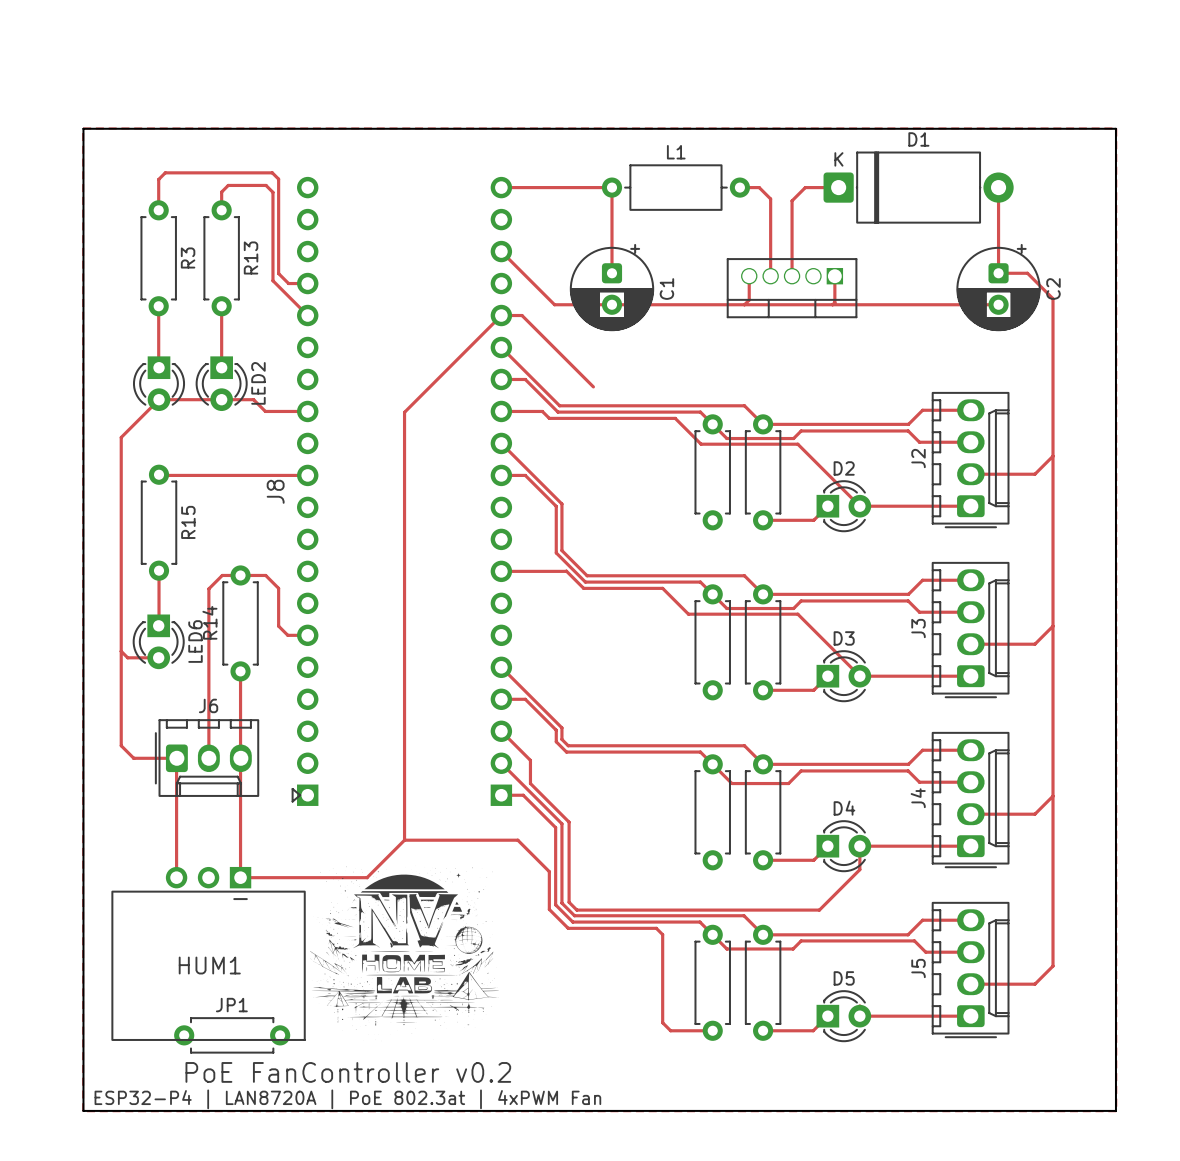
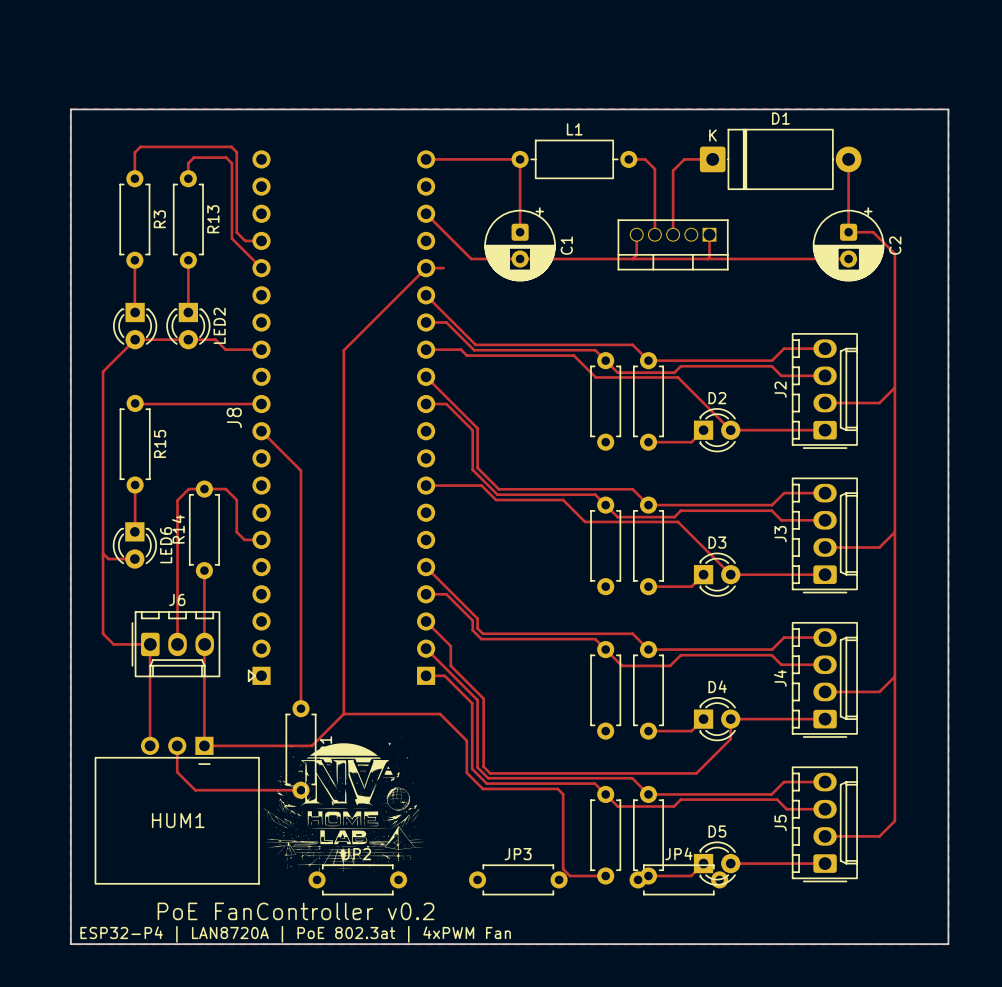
top track: (522, 315) (593, 386) -> none
top track: none -> (261, 431) (301, 470) (301, 708)
top track: none -> (177, 745) (177, 772) (195, 790) (301, 790)
JP1 rotation: 0° (232, 1035) -> 90° clockwise (301, 749)
JP1 position: (232, 1035) -> (301, 749)
JP2: none -> (357, 879)
JP3: none -> (518, 879)
JP4: none -> (678, 879)

